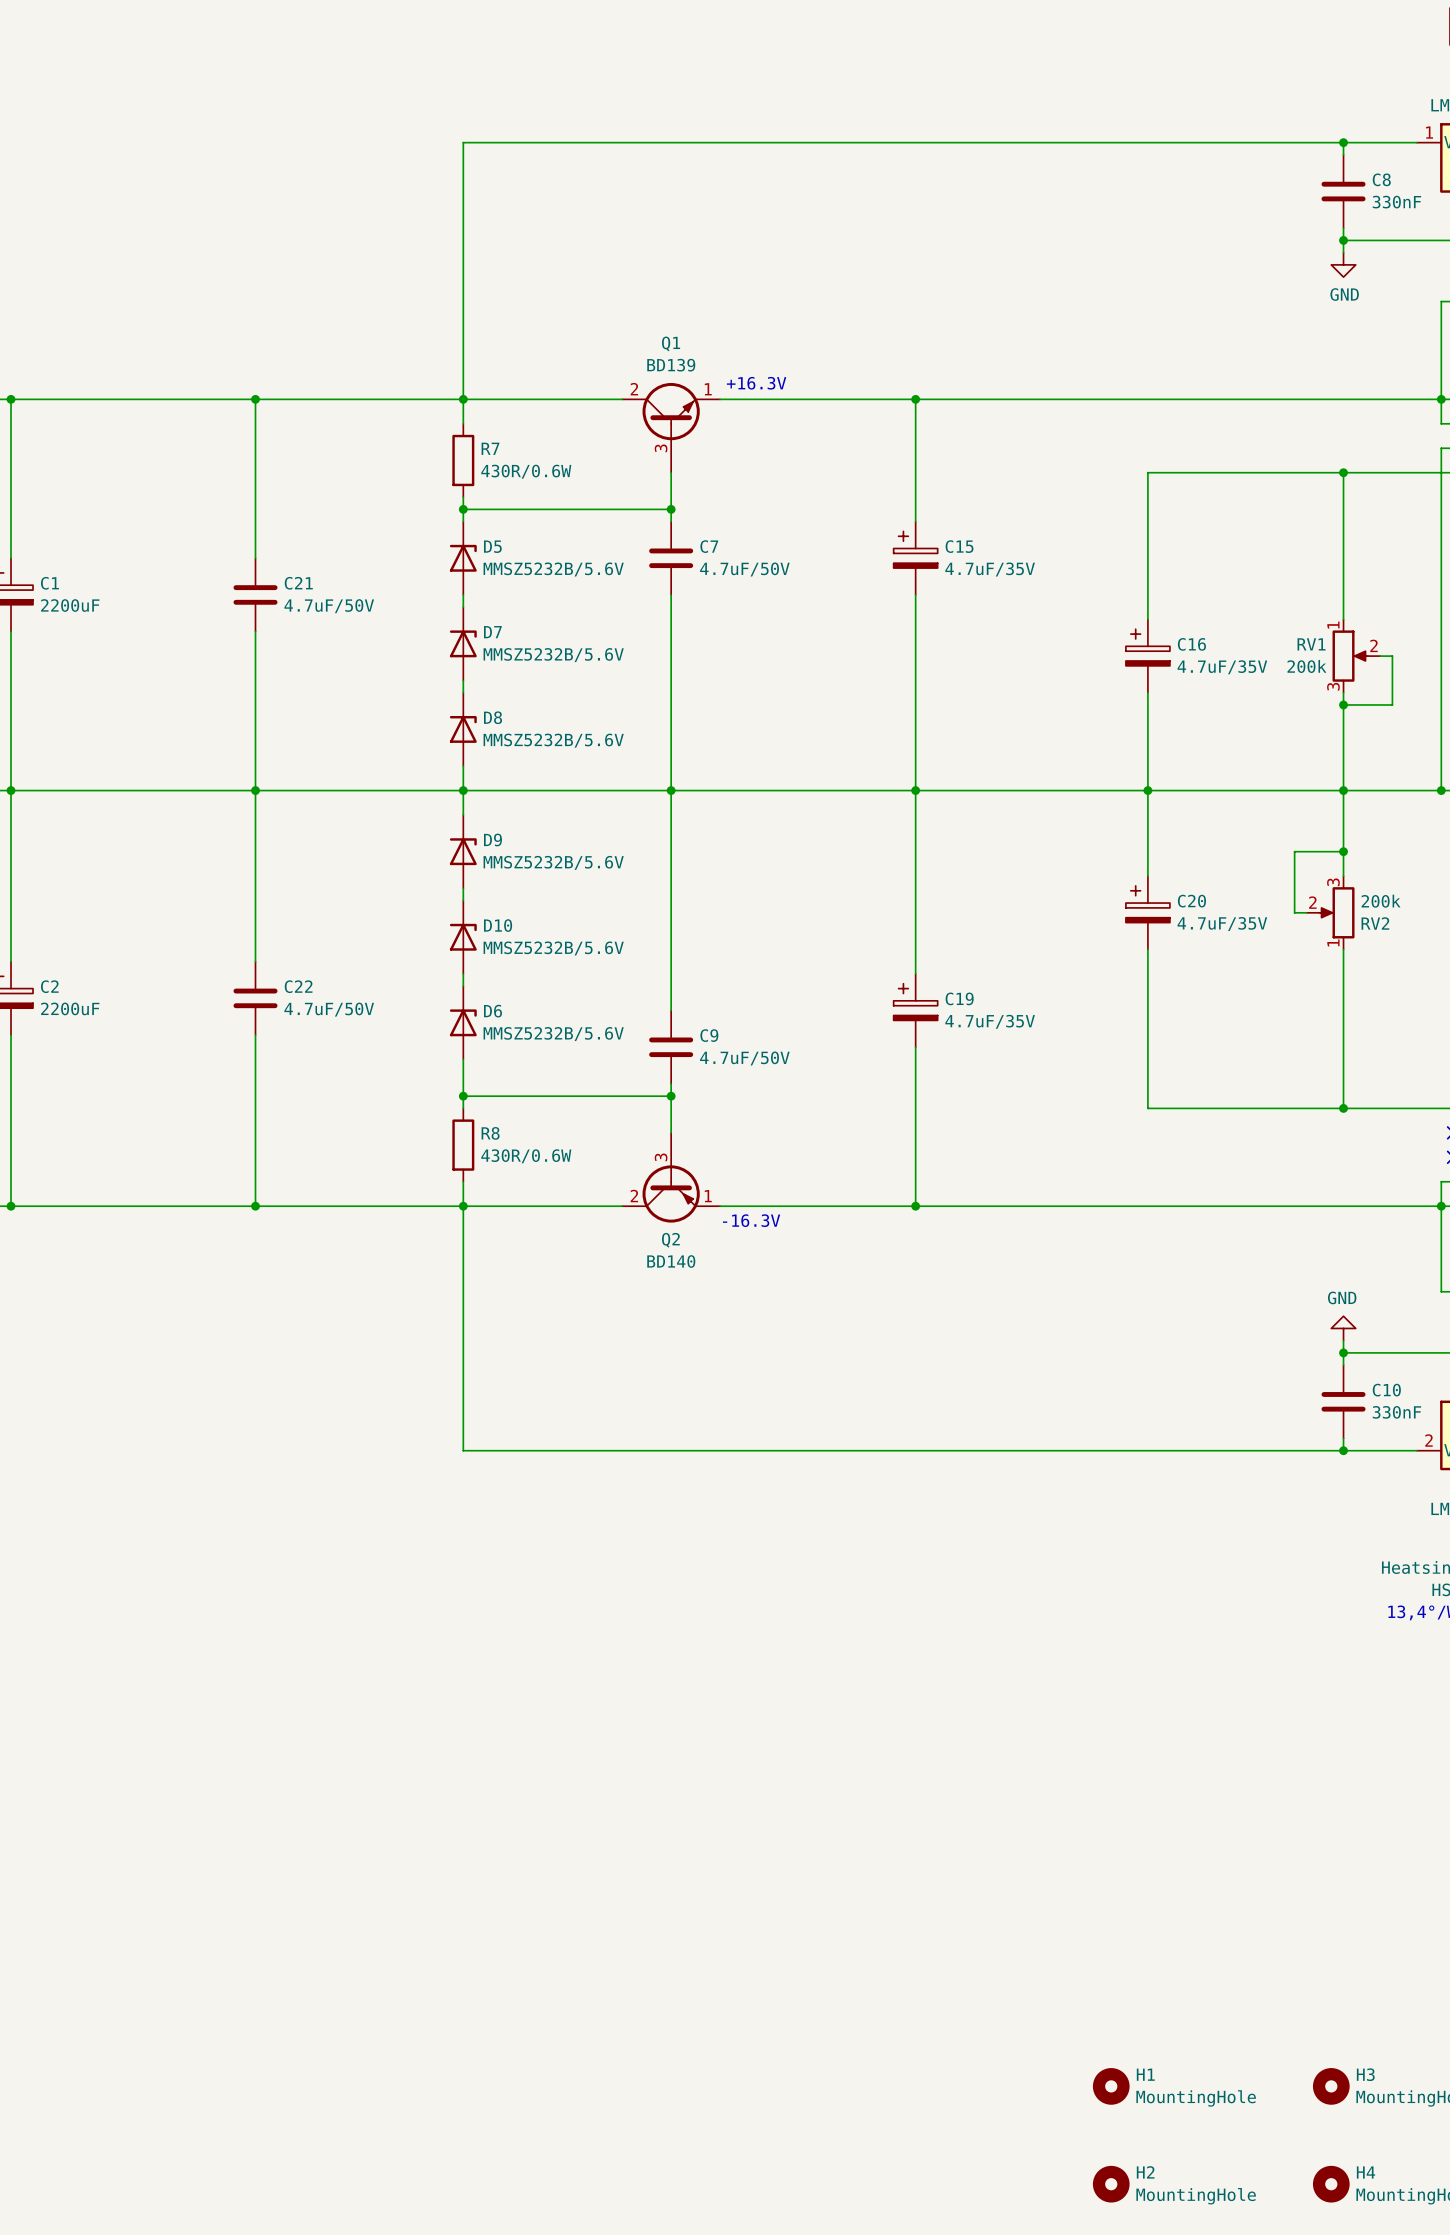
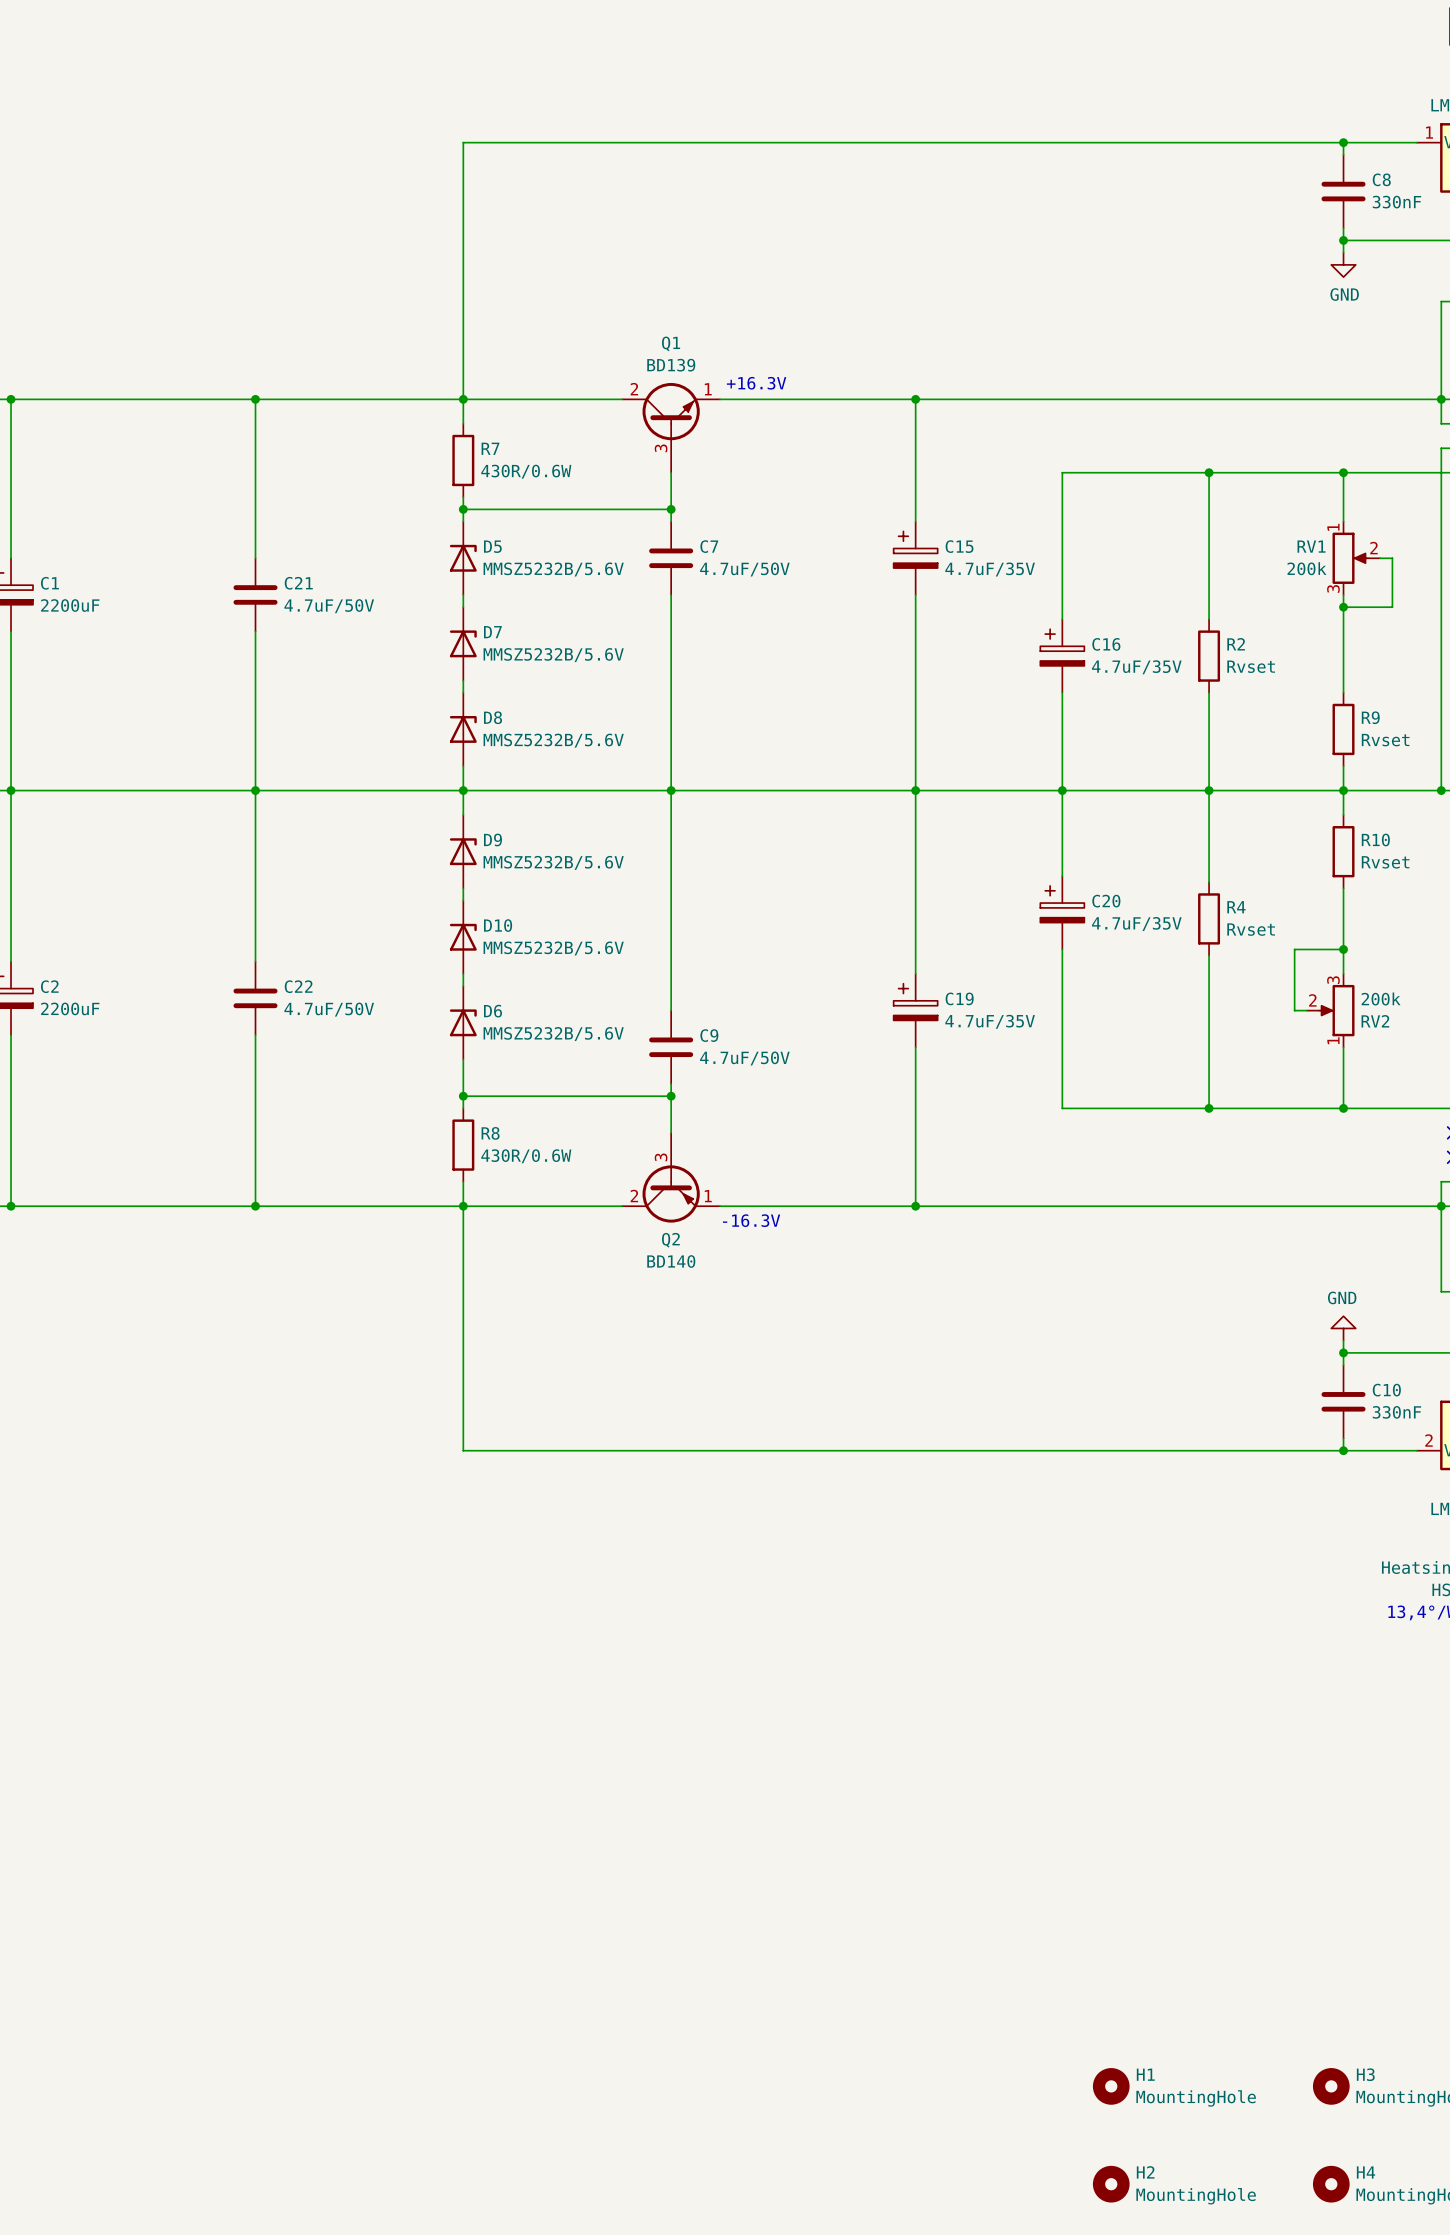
wire: (1147, 472) (1147, 619) -> (1147, 472) (1062, 472) (1062, 619)
wire: none -> (1209, 472) (1209, 619)
junction: none -> (1209, 472)
wire: (1343, 521) (1343, 594) -> none
junction: none -> (1343, 607)
C16 position: (1147, 656) -> (1062, 656)
R2: none -> Rvset (1209, 656)
RV1 position: (1356, 656) -> (1356, 558)
wire: (1380, 656) (1392, 656) (1392, 704) (1343, 704) -> (1380, 558) (1392, 558) (1392, 607) (1343, 607)
wire: (1147, 692) (1147, 876) -> (1062, 692) (1062, 876)
wire: none -> (1209, 692) (1209, 882)
wire: (1343, 692) (1343, 766) -> (1343, 692) (1343, 619)
junction: (1343, 704) -> none
R9: none -> Rvset (1343, 729)
junction: none -> (1062, 790)
junction: (1147, 790) -> none
junction: none -> (1209, 790)
wire: (1343, 815) (1343, 876) -> none
wire: (1343, 851) (1294, 851) (1294, 912) (1306, 912) -> none
junction: (1343, 851) -> none
R10: none -> Rvset (1343, 851)
wire: none -> (1343, 888) (1343, 949) (1294, 949) (1294, 1010) (1306, 1010)
C20 position: (1147, 912) -> (1062, 912)
RV2 position: (1330, 912) -> (1330, 1010)
R4: none -> Rvset (1209, 918)
wire: (1147, 949) (1147, 1108) -> (1062, 949) (1062, 1108) (1147, 1108)
junction: none -> (1343, 949)
wire: none -> (1209, 955) (1209, 1108)
wire: (1343, 973) (1343, 1047) -> none
junction: none -> (1209, 1108)

